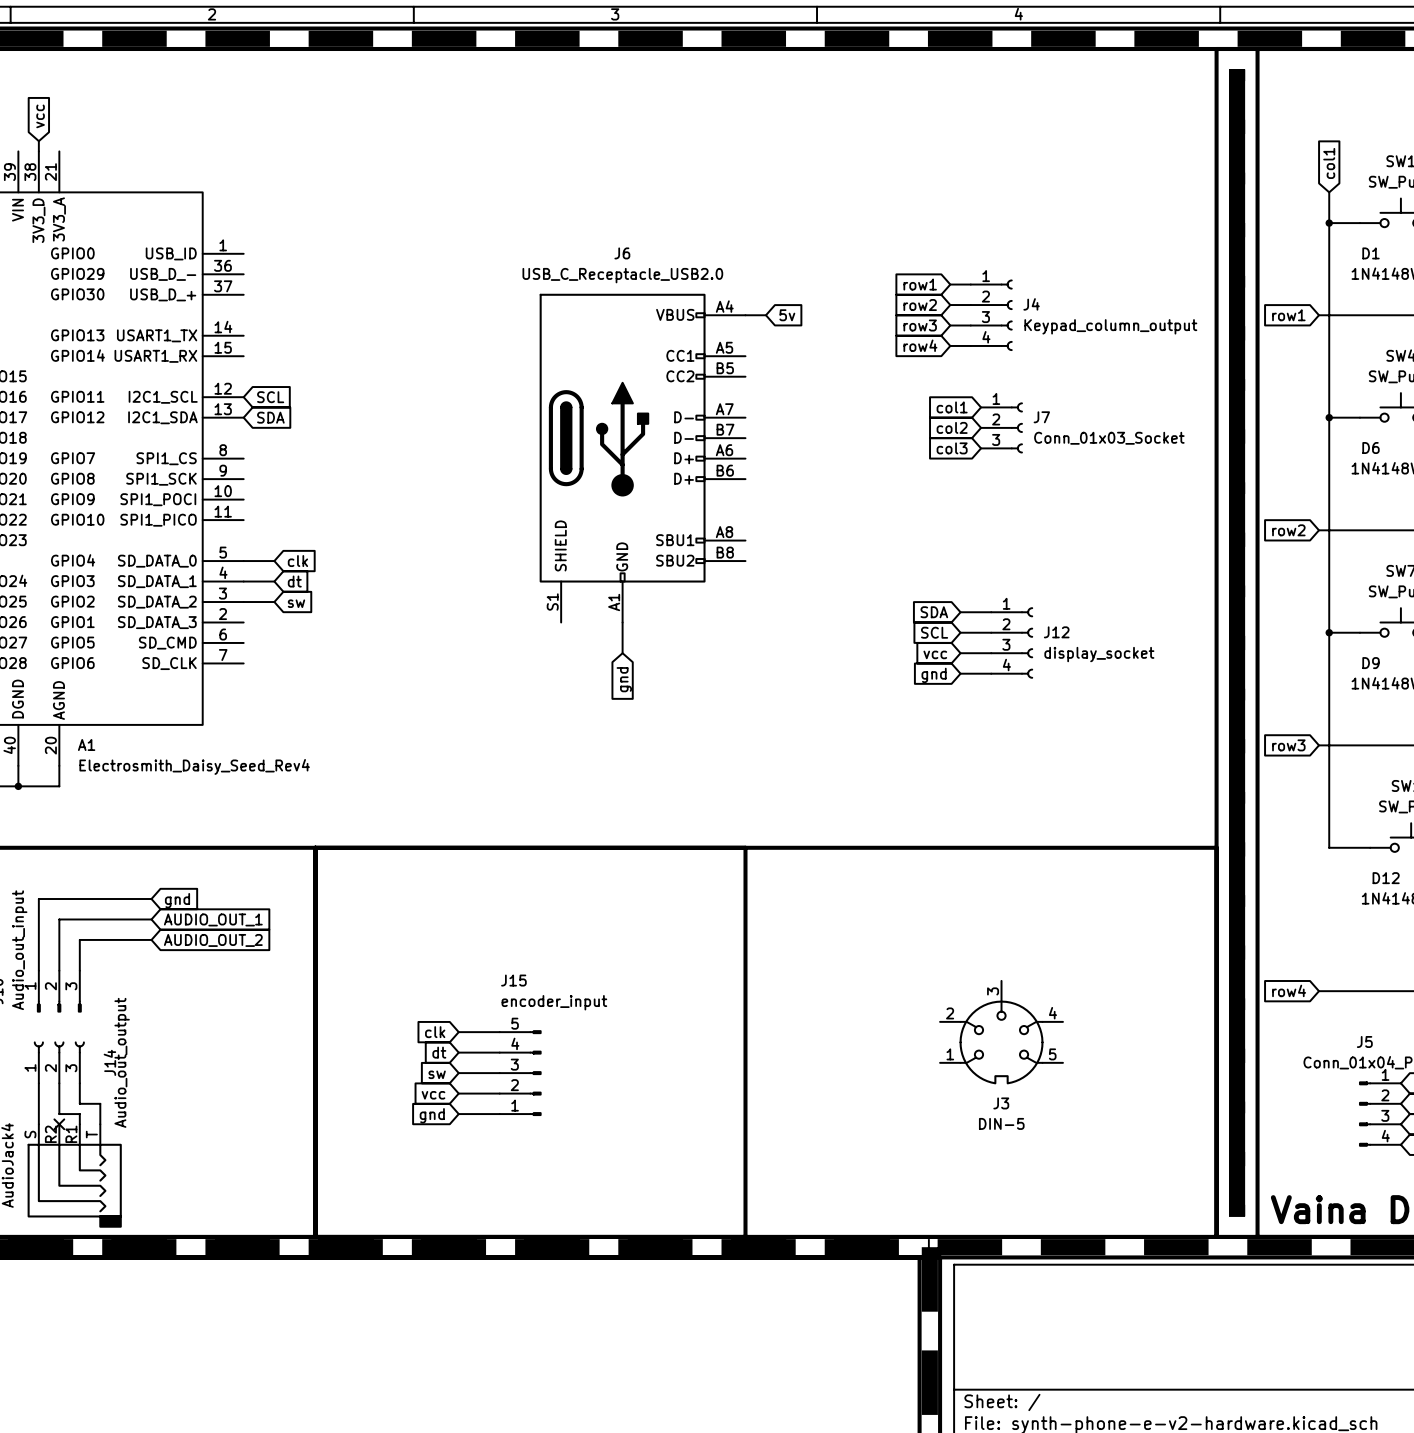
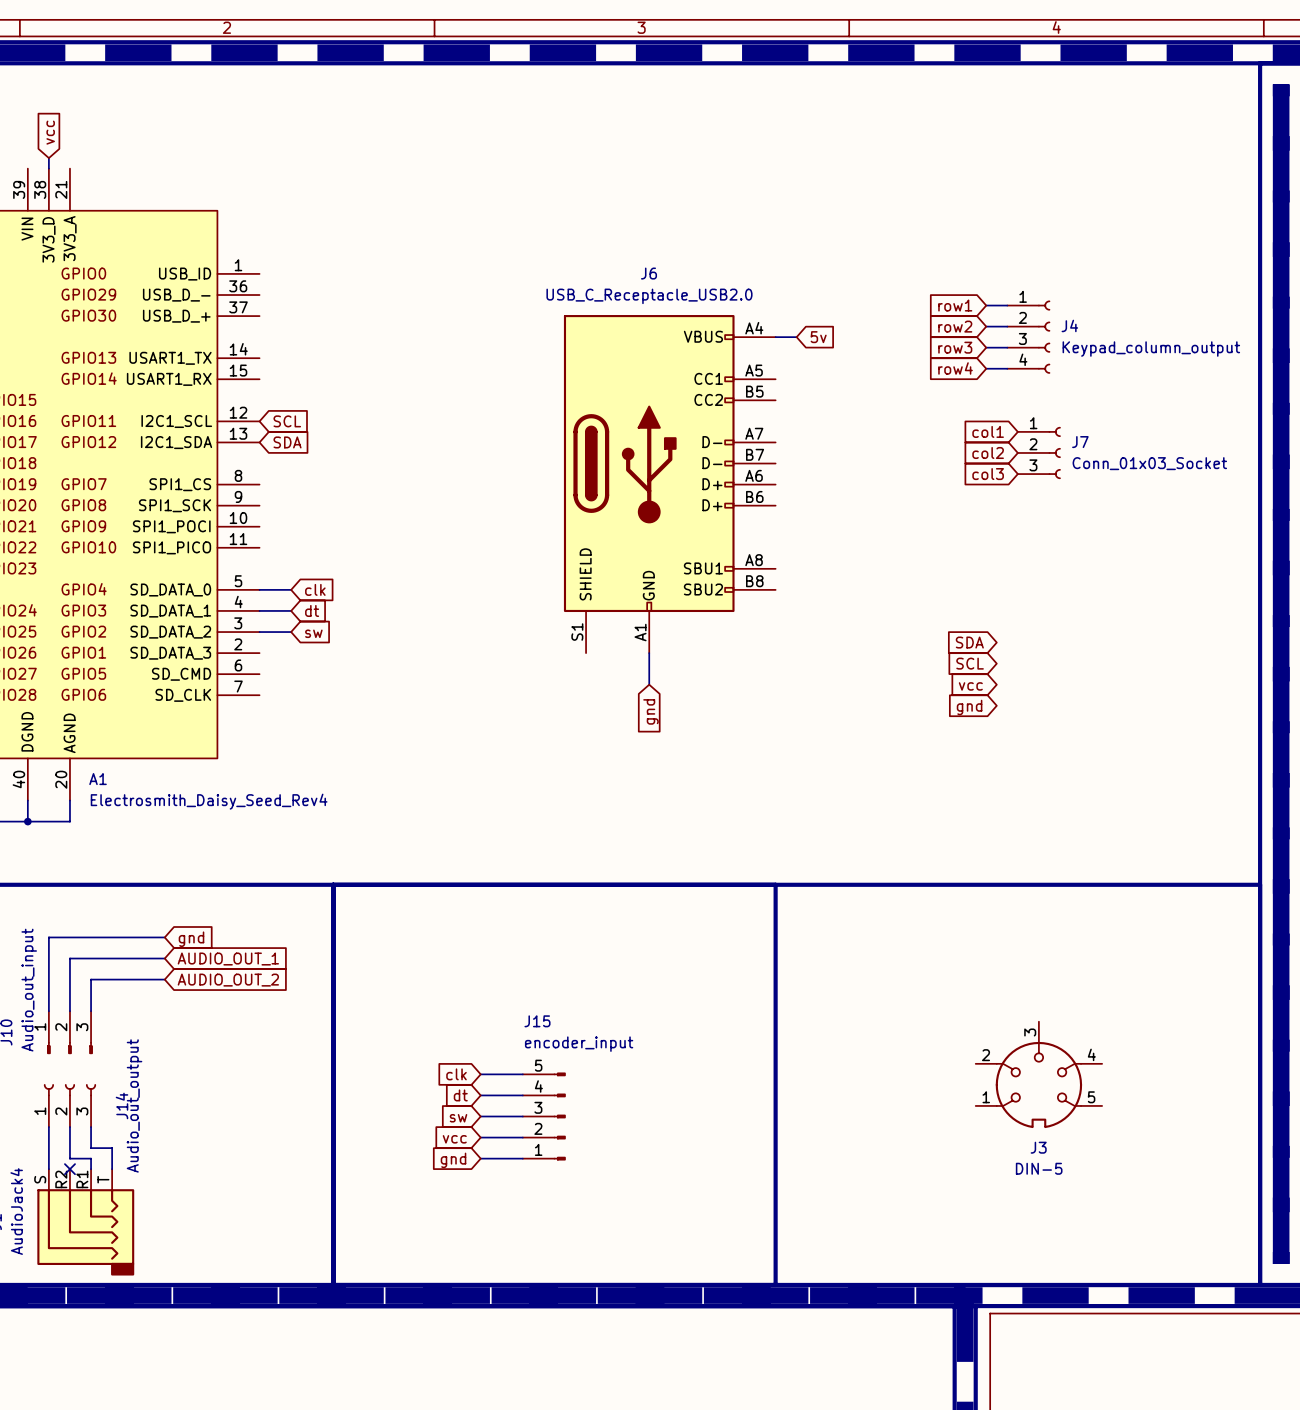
wire: (960, 612) (991, 612) -> none
wire: (960, 632) (991, 632) -> none
J12: display_socket (1012, 642) -> none
wire: (960, 653) (991, 653) -> none
wire: (960, 673) (991, 673) -> none

